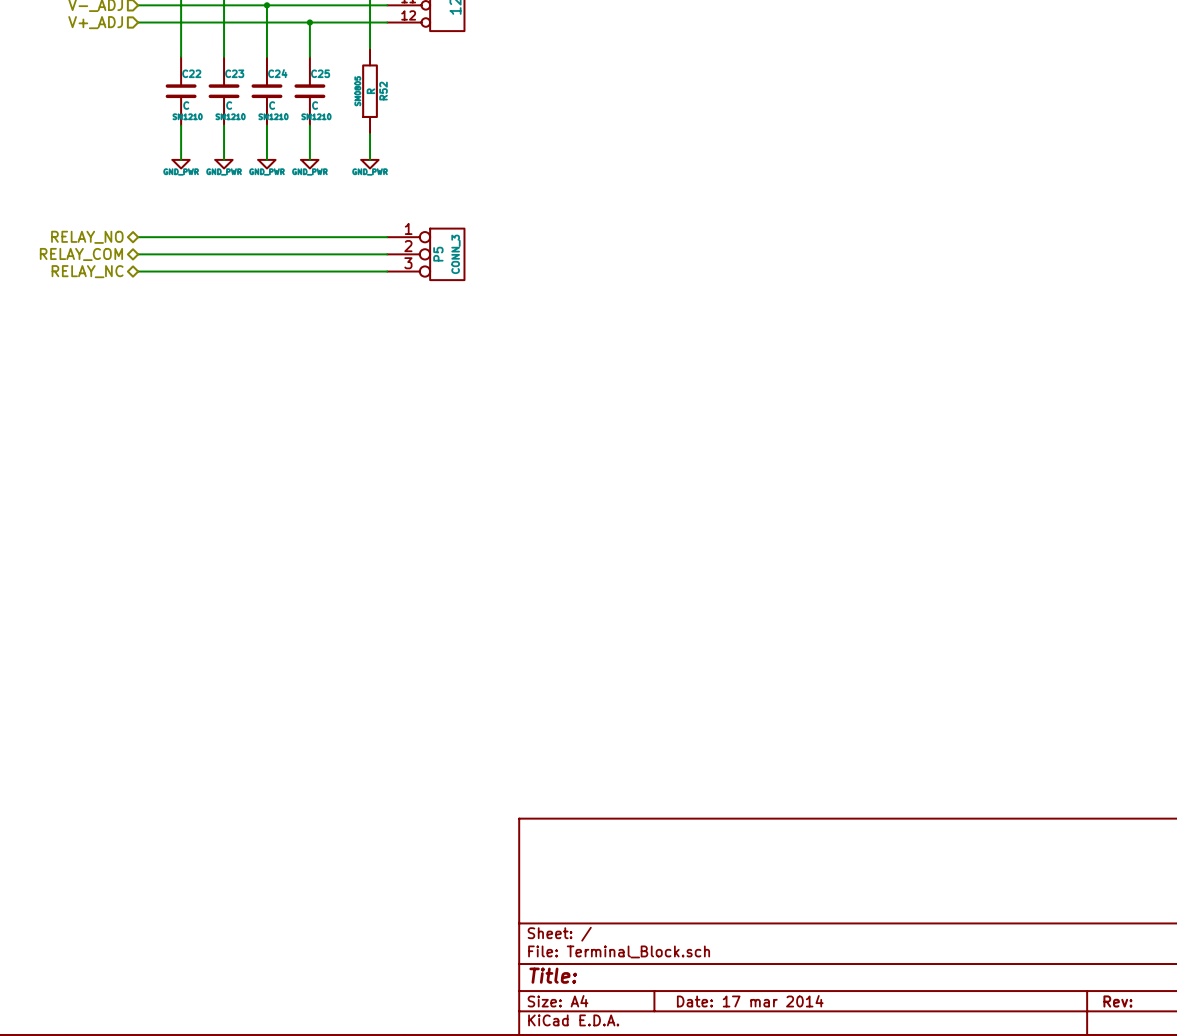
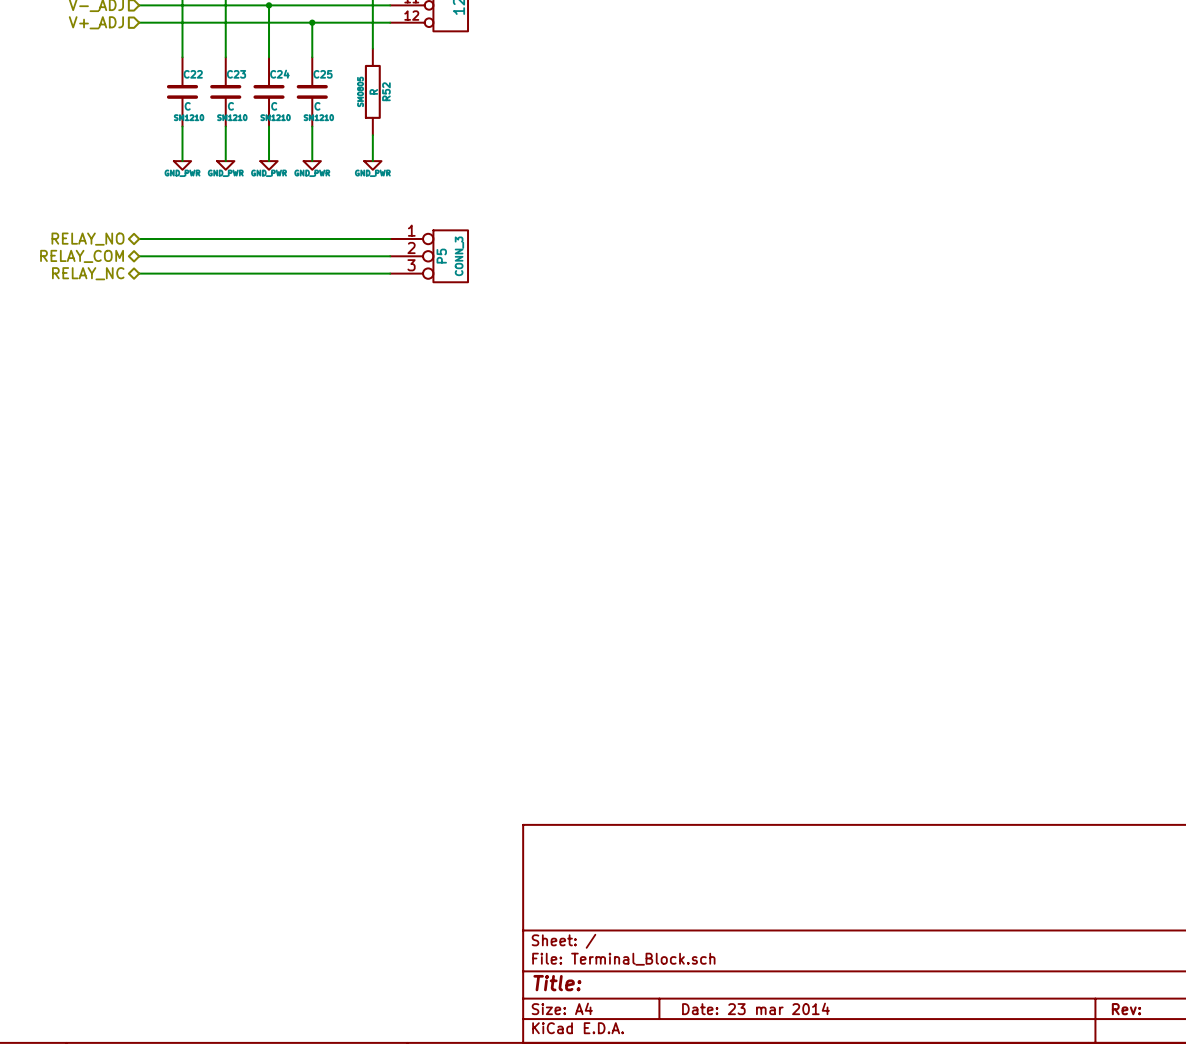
title block: Date: 17 mar 2014 (750, 1001) -> Date: 23 mar 2014 (755, 1008)

